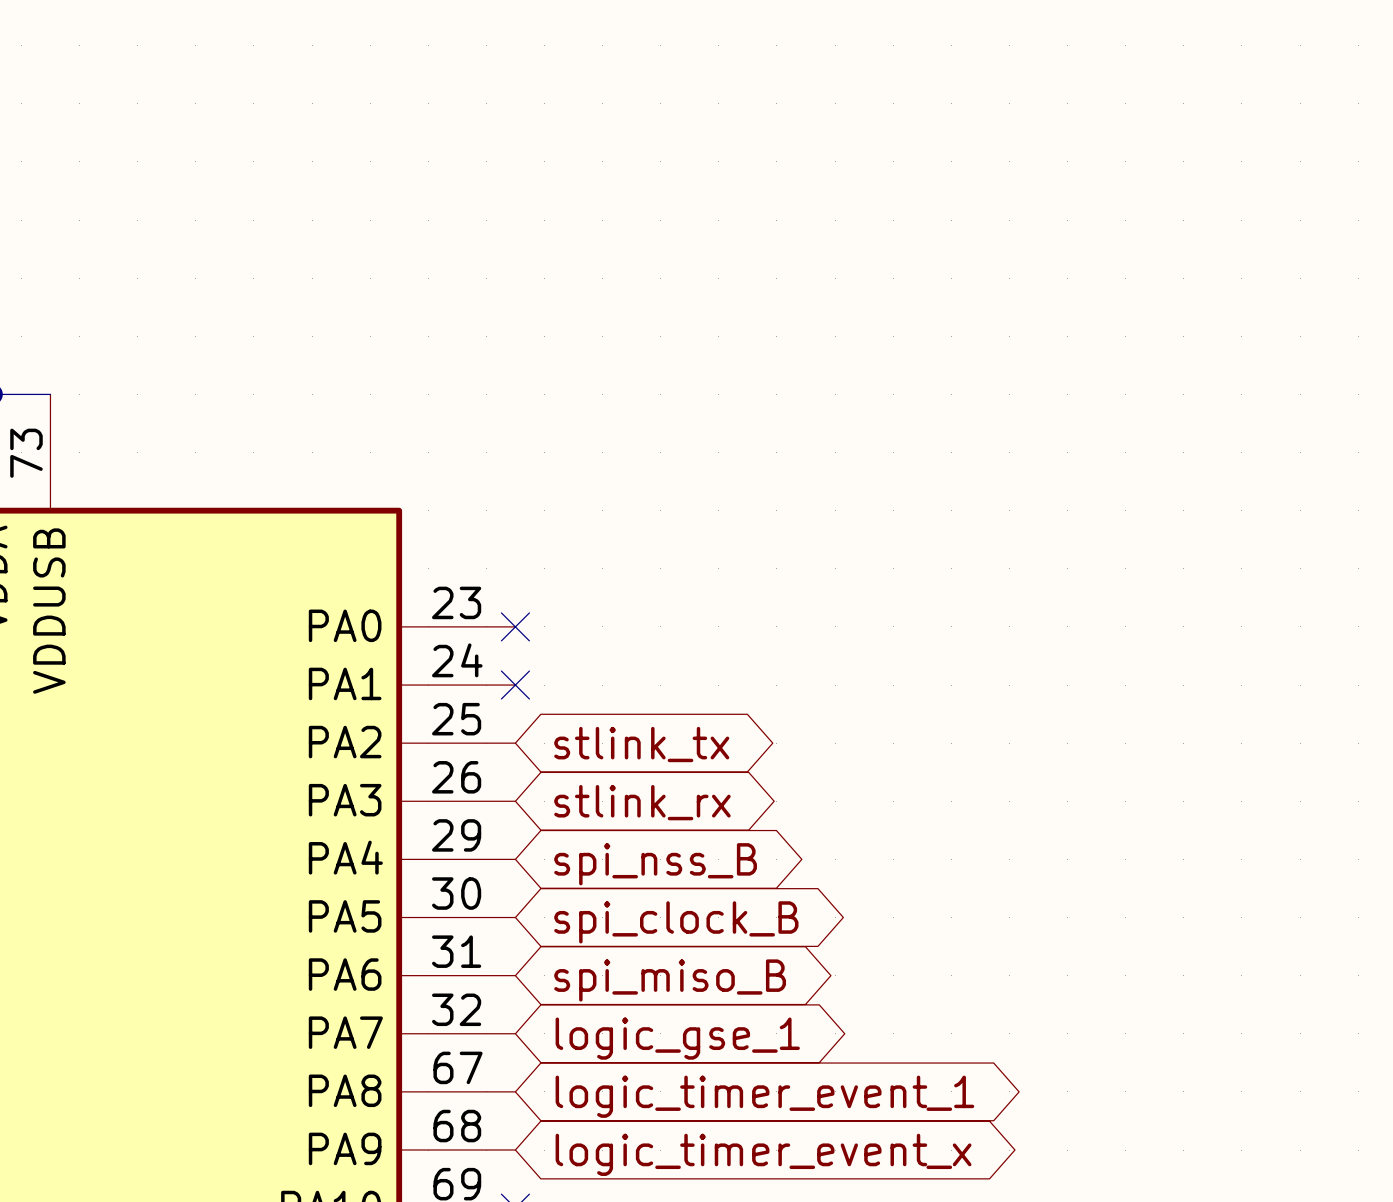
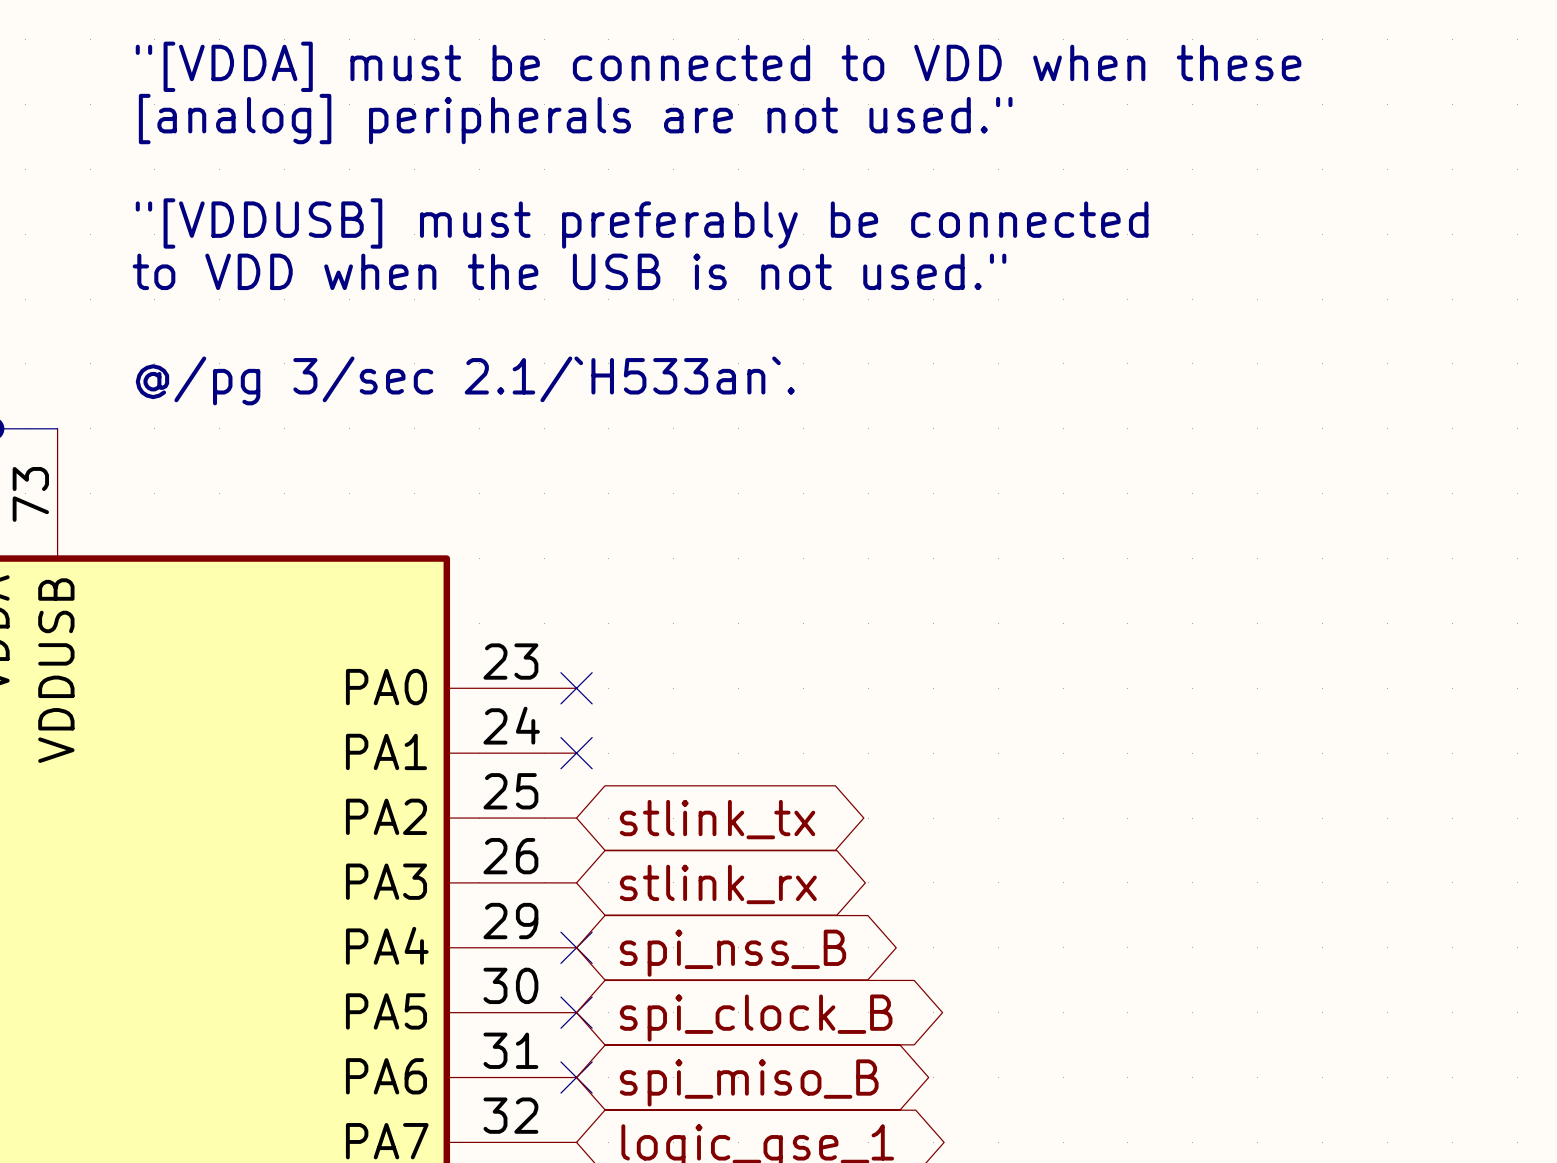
text: none -> "[VDDA] must be connected to VDD when these (718, 66)
text: none -> [analog] peripherals are not used." (575, 119)
text: none -> "[VDDUSB] must preferably be connected (642, 223)
text: none -> to VDD when the USB is not used." (569, 271)
text: none -> @/pg 3/sec 2.1/`H533an`. (465, 380)
no-connect mark: none -> (576, 947)
no-connect mark: none -> (576, 1012)
no-connect mark: none -> (576, 1077)

